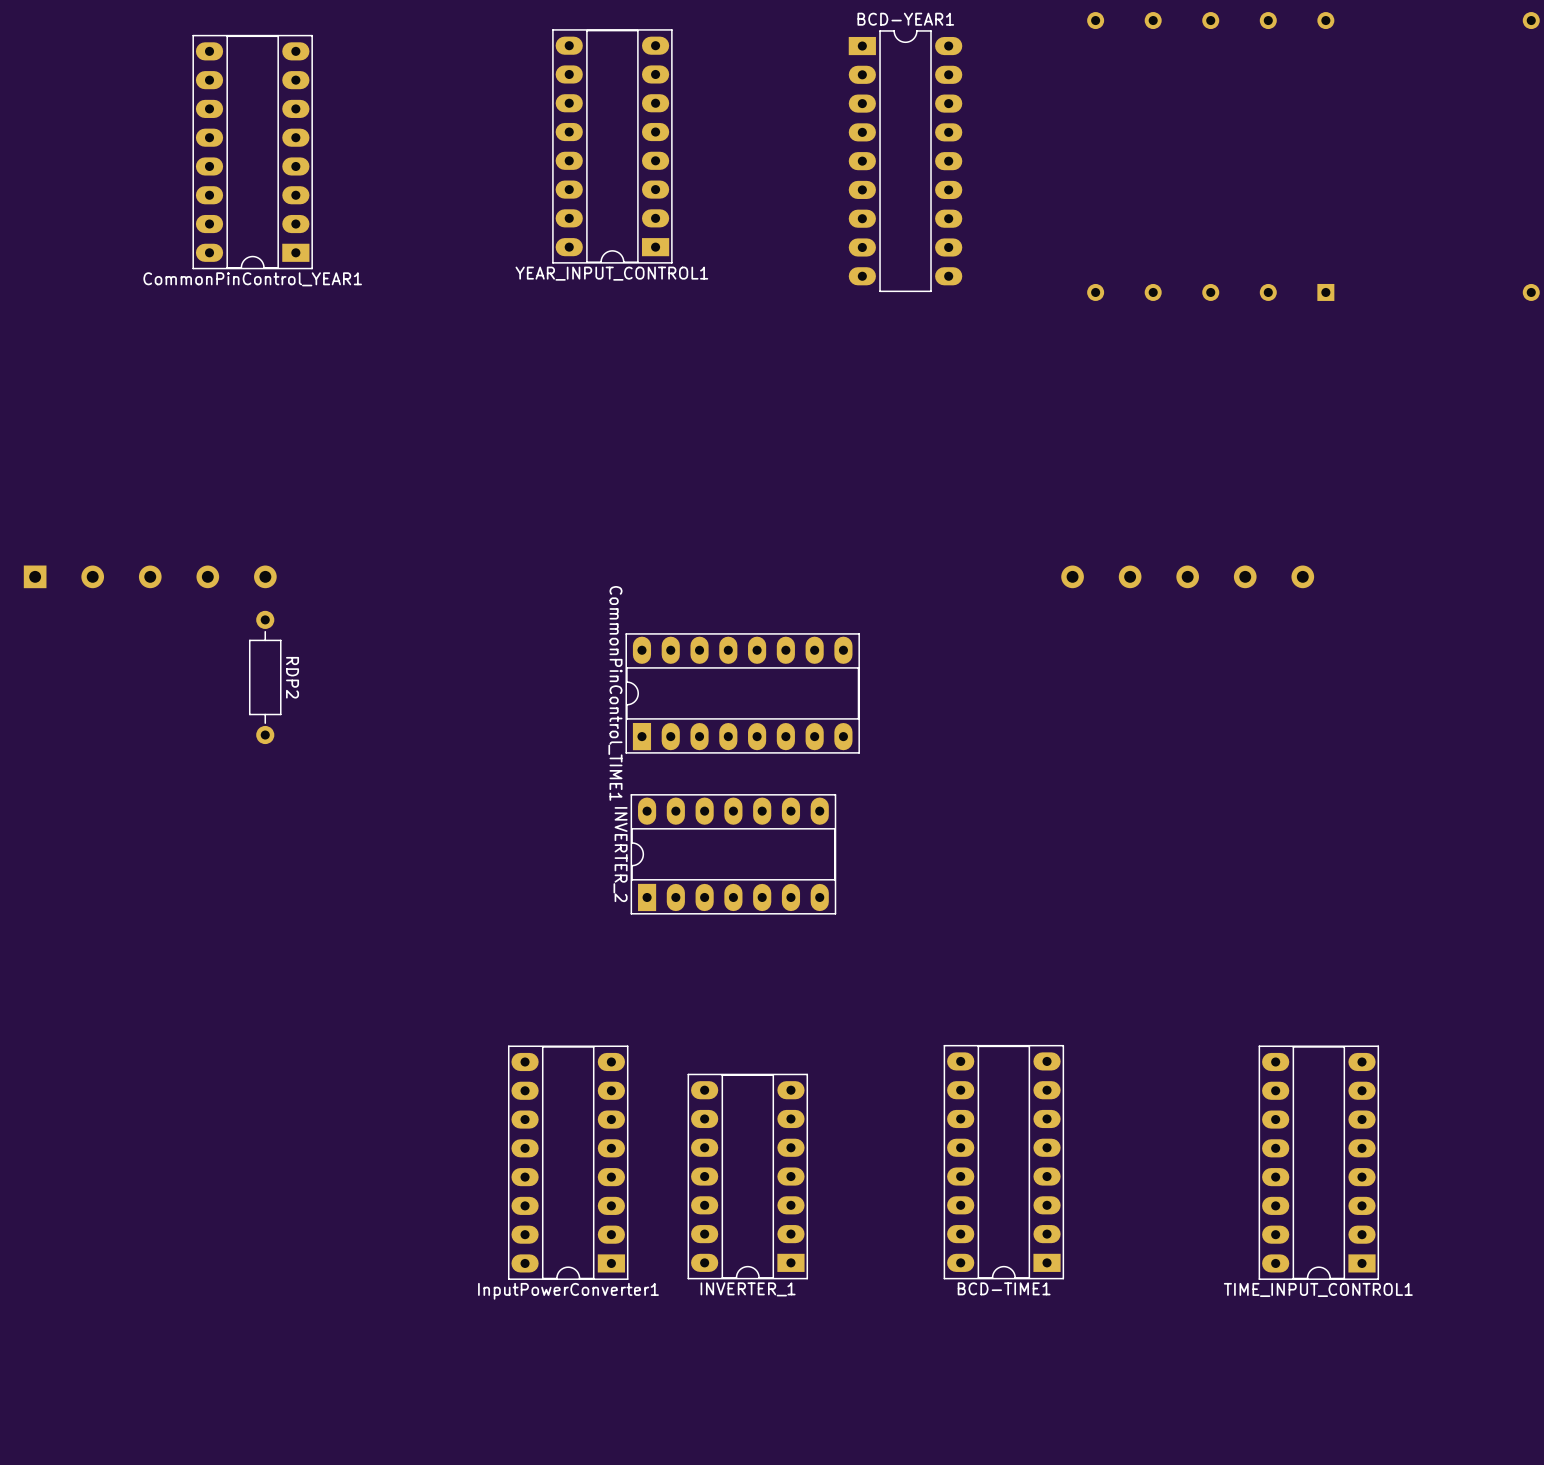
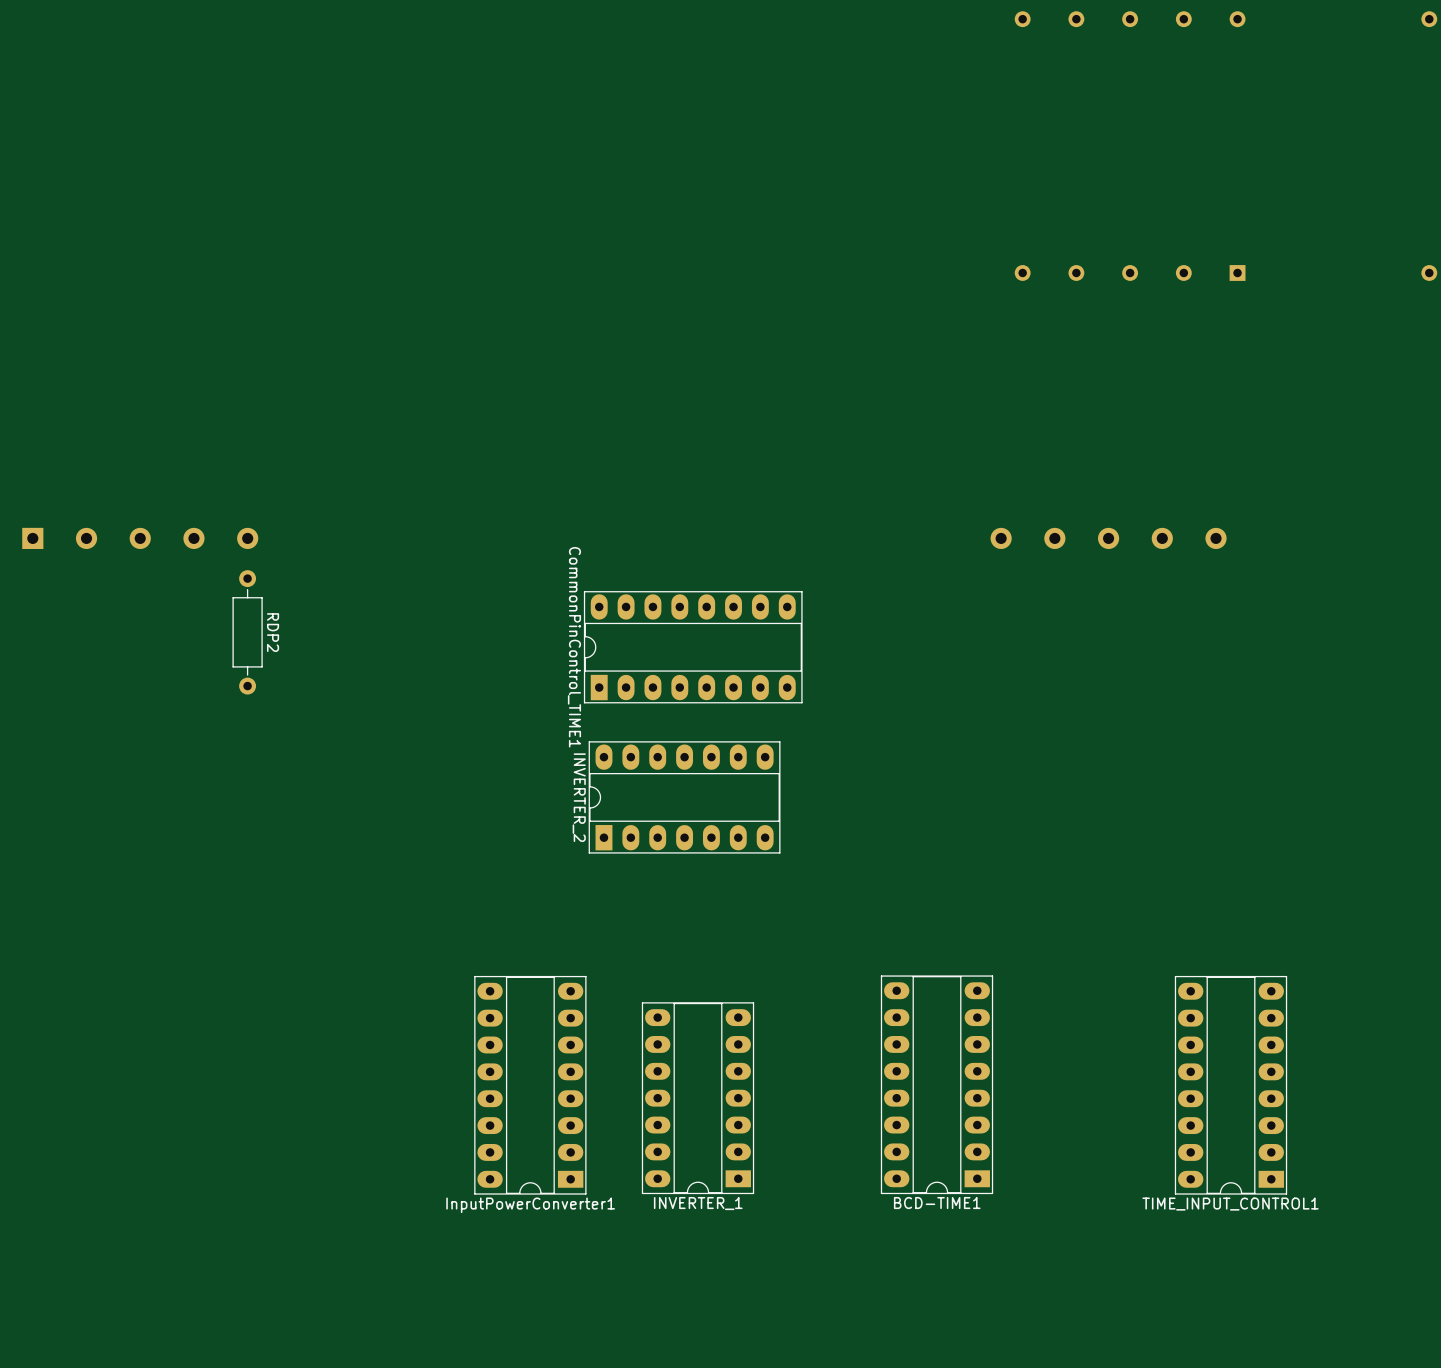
YEAR_INPUT_CONTROL1: (612, 146) -> none
CommonPinControl_YEAR1: (252, 152) -> none
BCD-YEAR1: (905, 161) -> none

